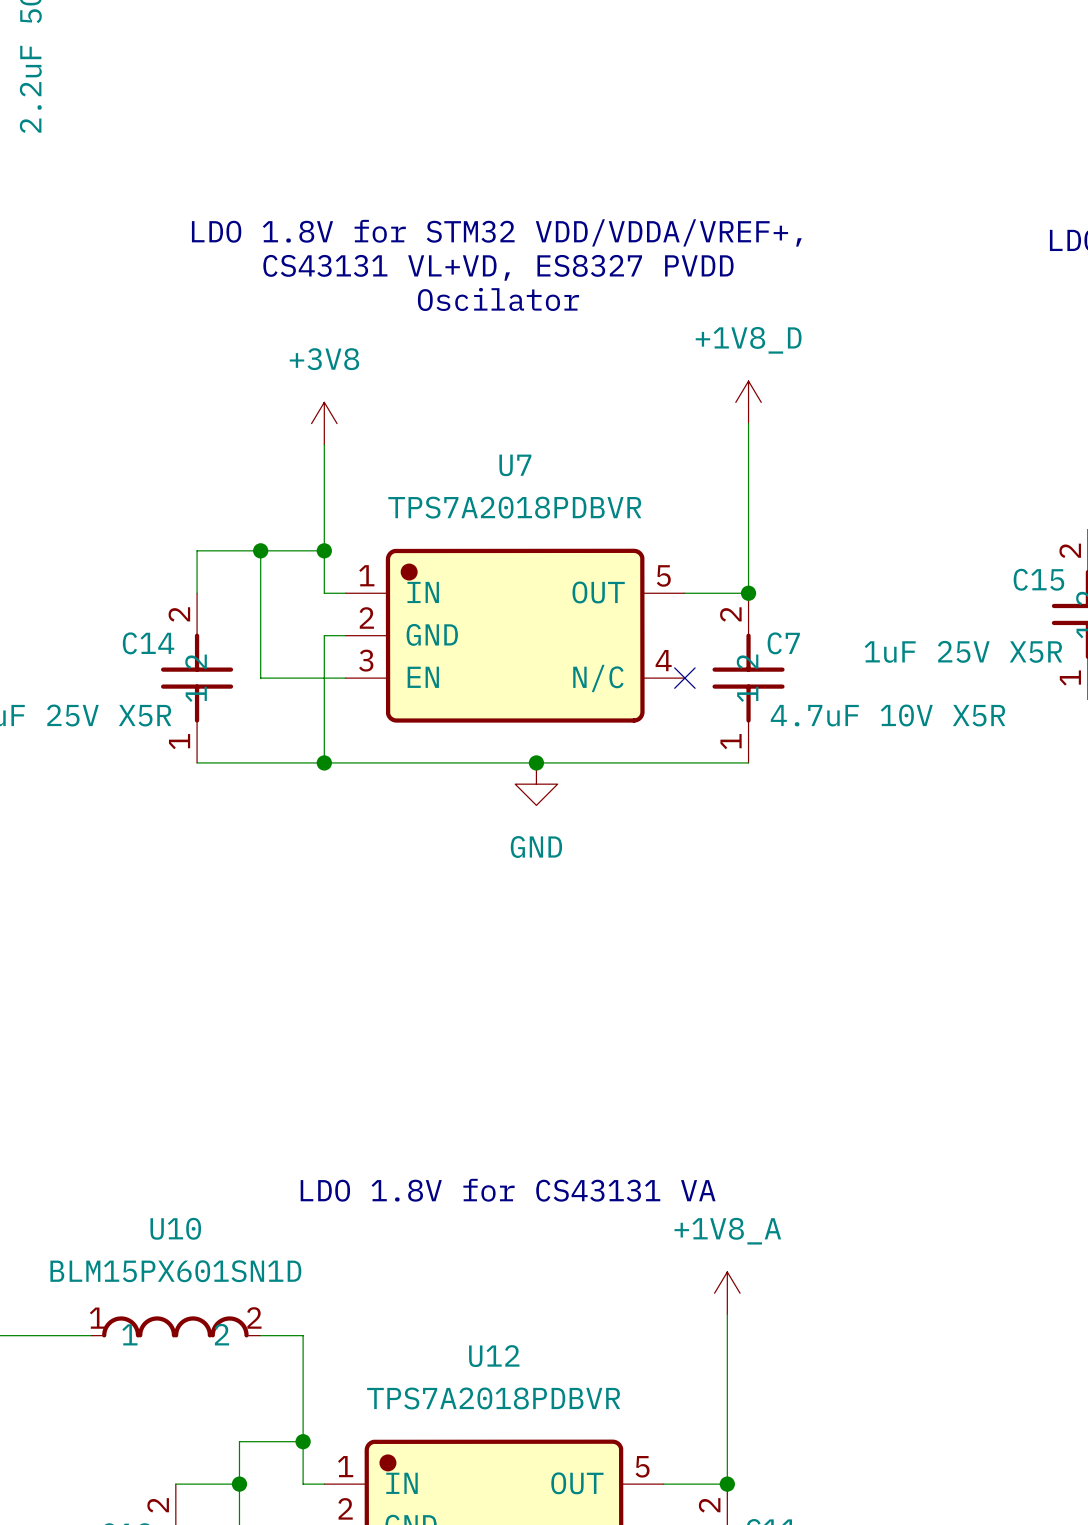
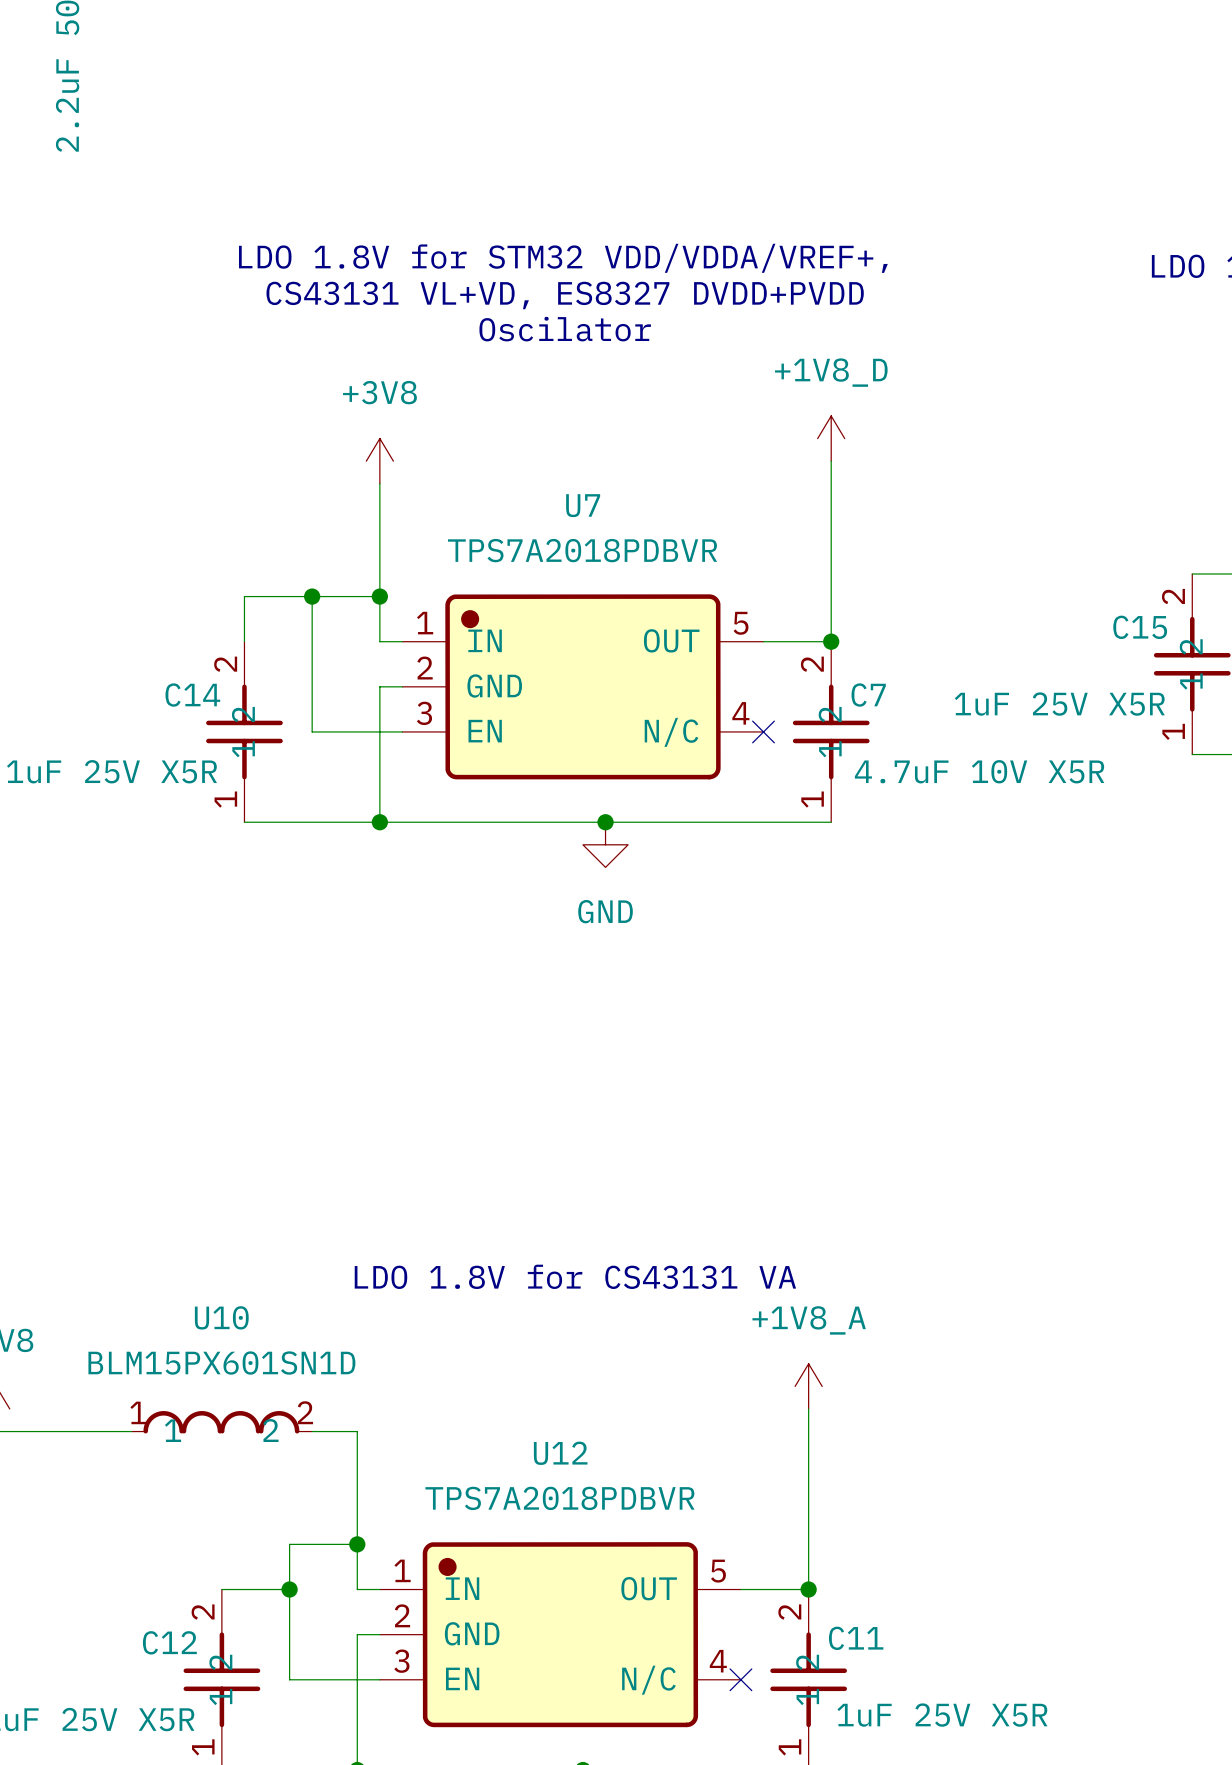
text: CS43131 VL+VD, ES8327 PVDD (498, 267) -> CS43131 VL+VD, ES8327 DVDD+PVDD (565, 295)

